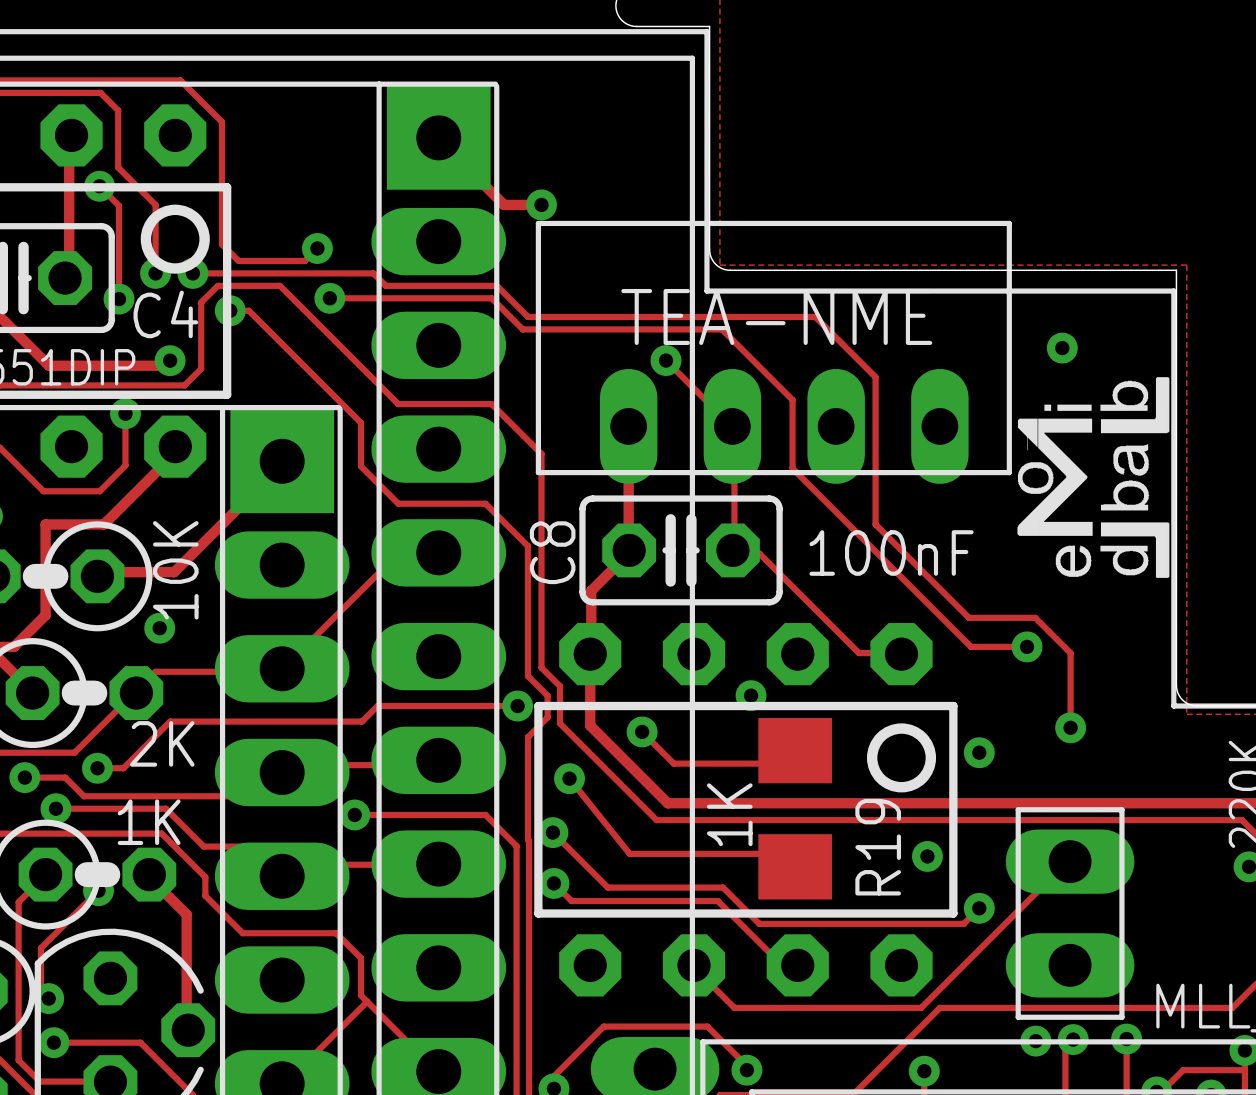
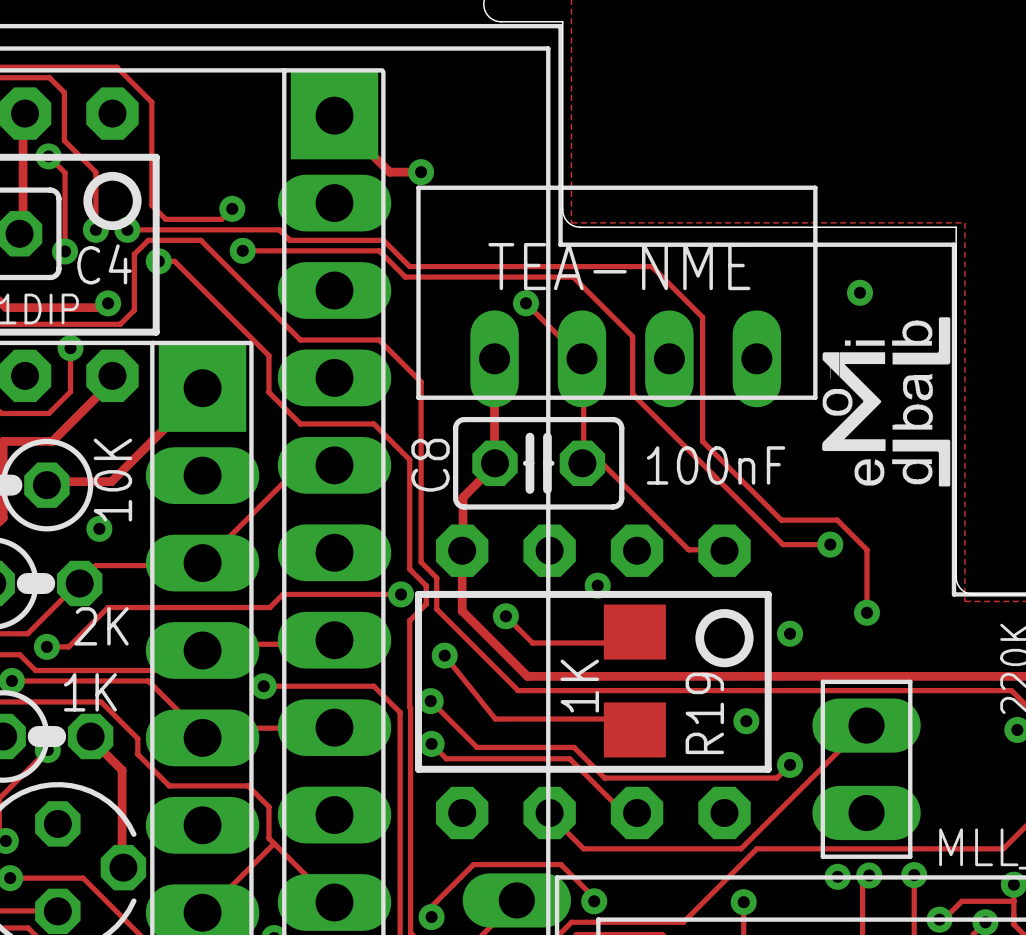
track: (165, 808) (203, 846) (252, 846) (282, 876) -> (104, 680) (148, 680) (200, 733) (202, 737)

